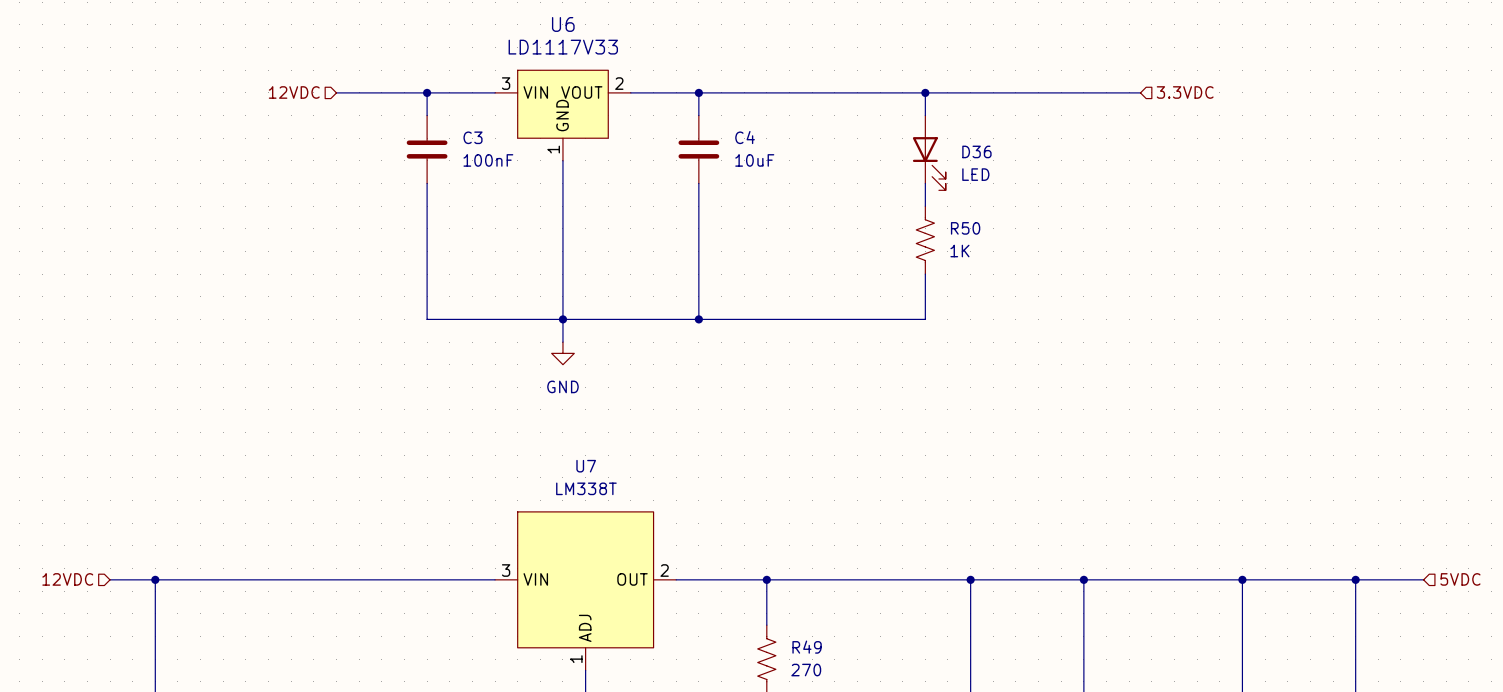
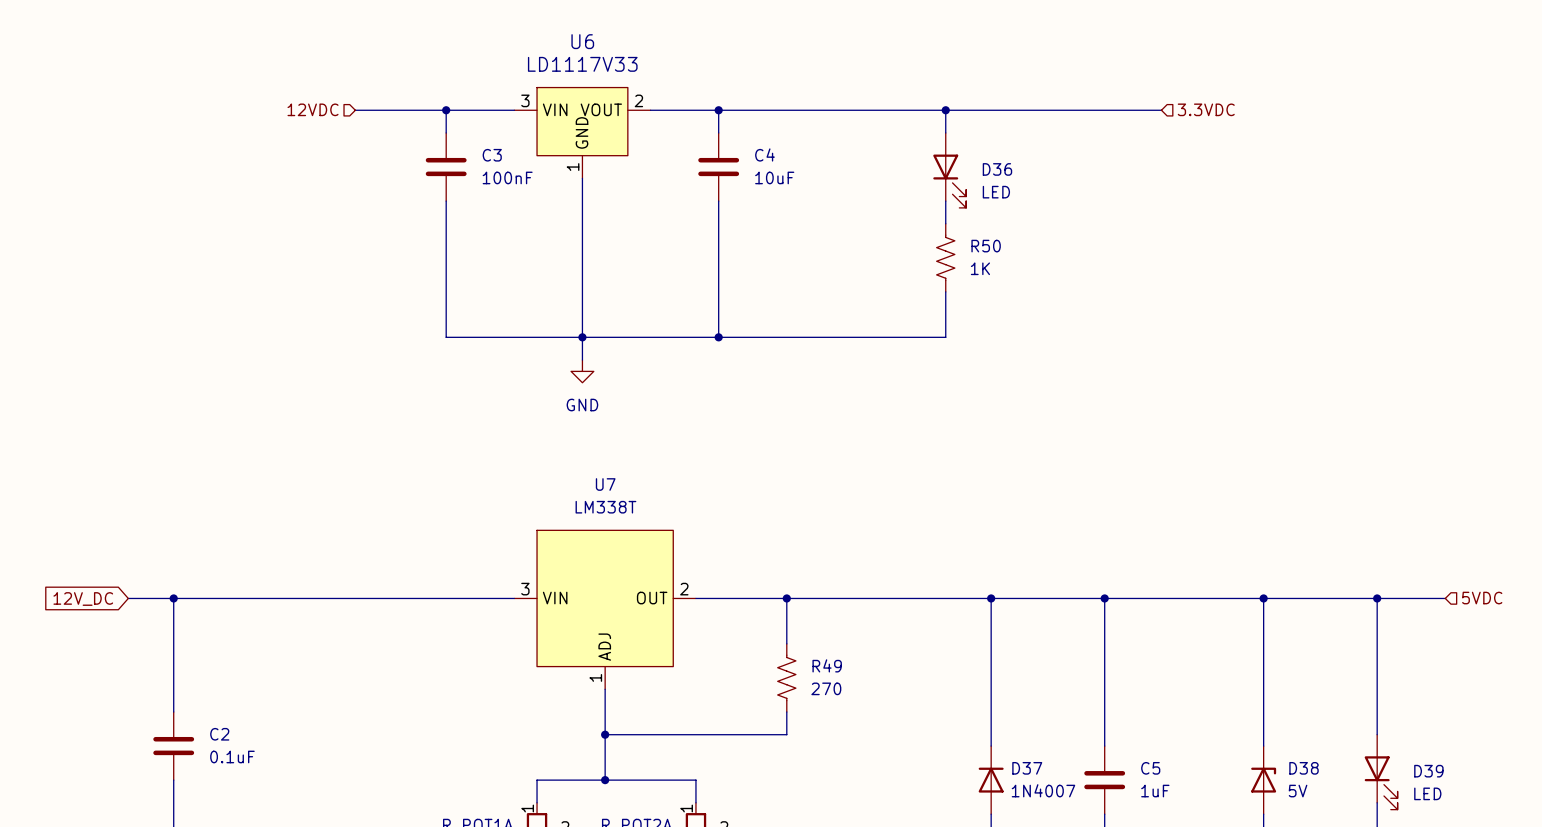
hierarchical label: 12VDC (67, 579) -> none
global label: none -> 12V_DC (83, 599)

